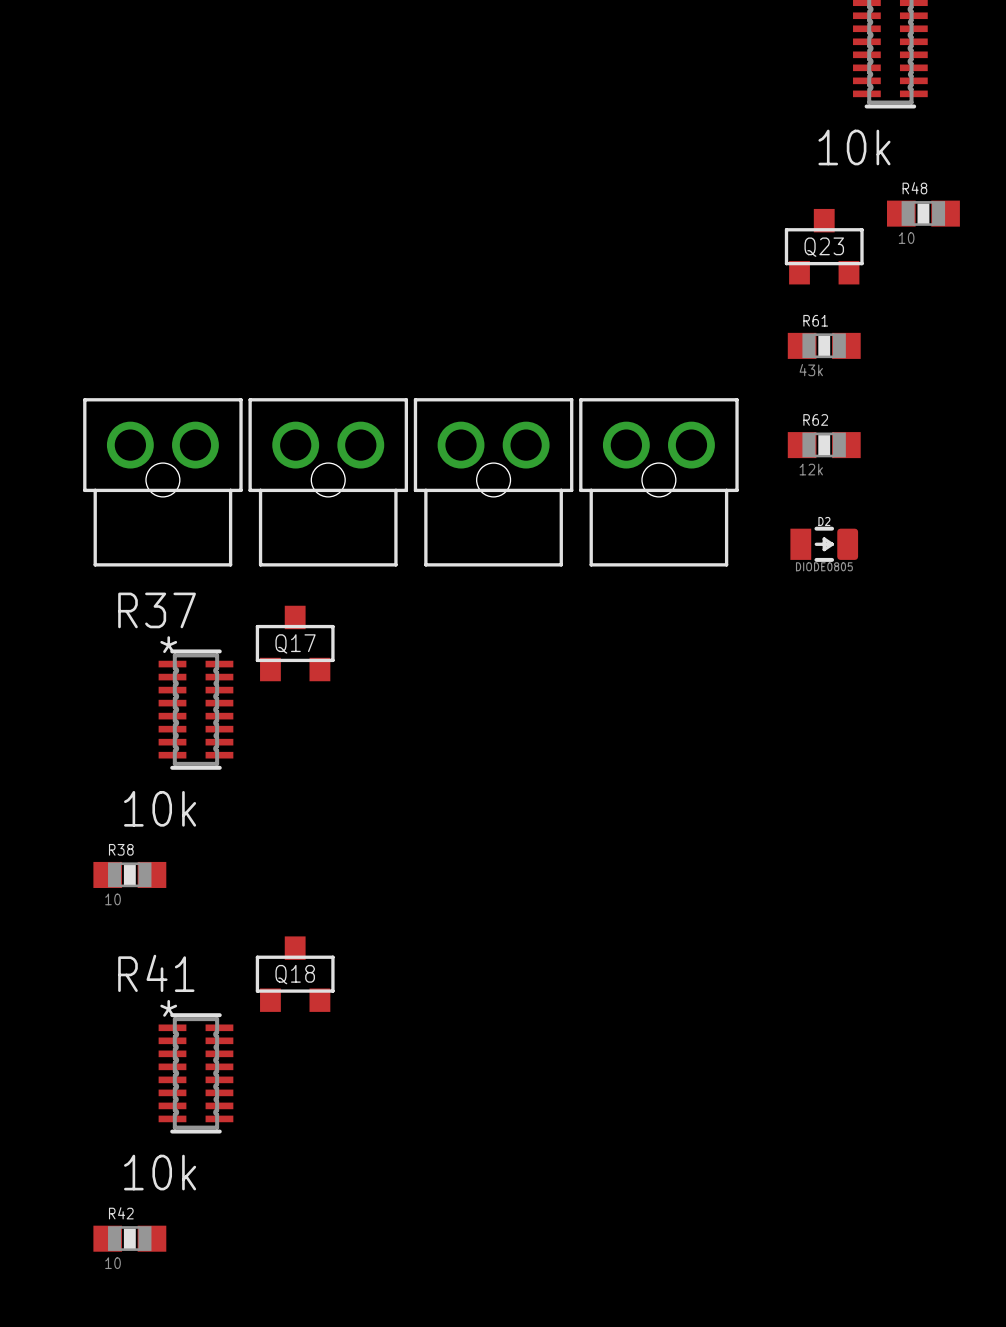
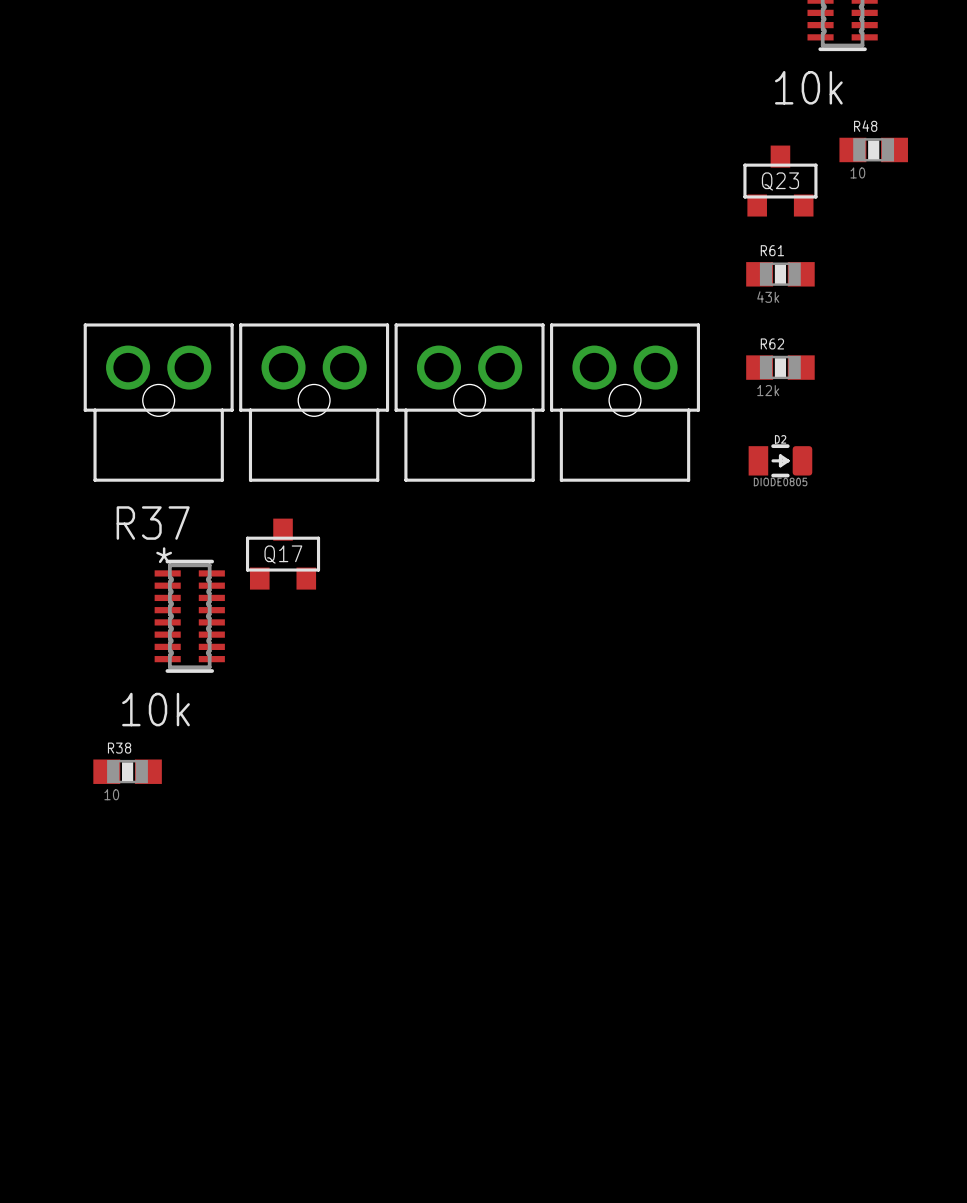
Q18: (295, 974) -> none
R41: 10k (195, 1073) -> none
R42: 10 (129, 1238) -> none

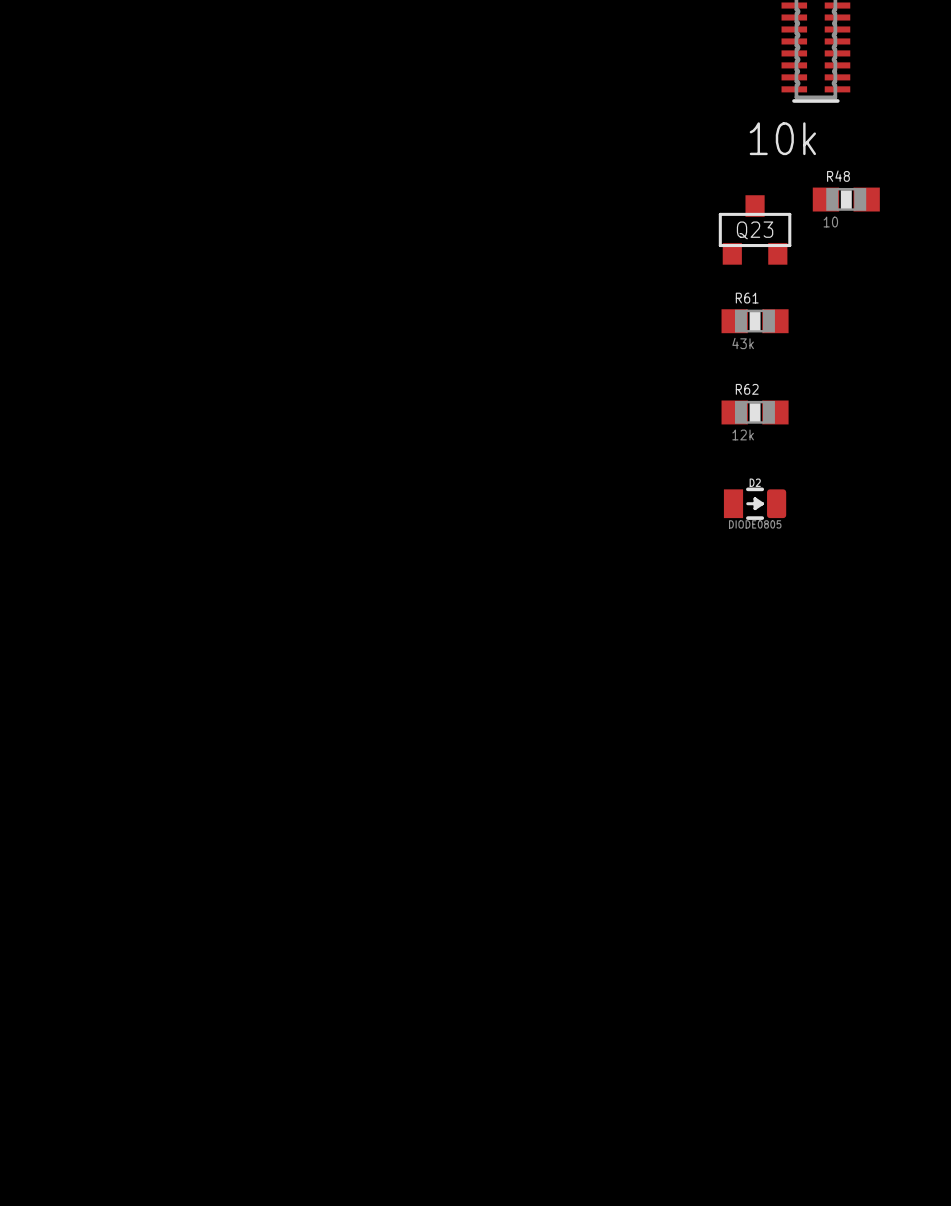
part: (158, 402) -> none
part: (314, 402) -> none
part: (469, 402) -> none
part: (625, 402) -> none
Q17: (283, 554) -> none
R37: 10k (189, 616) -> none
R38: 10 (127, 771) -> none

